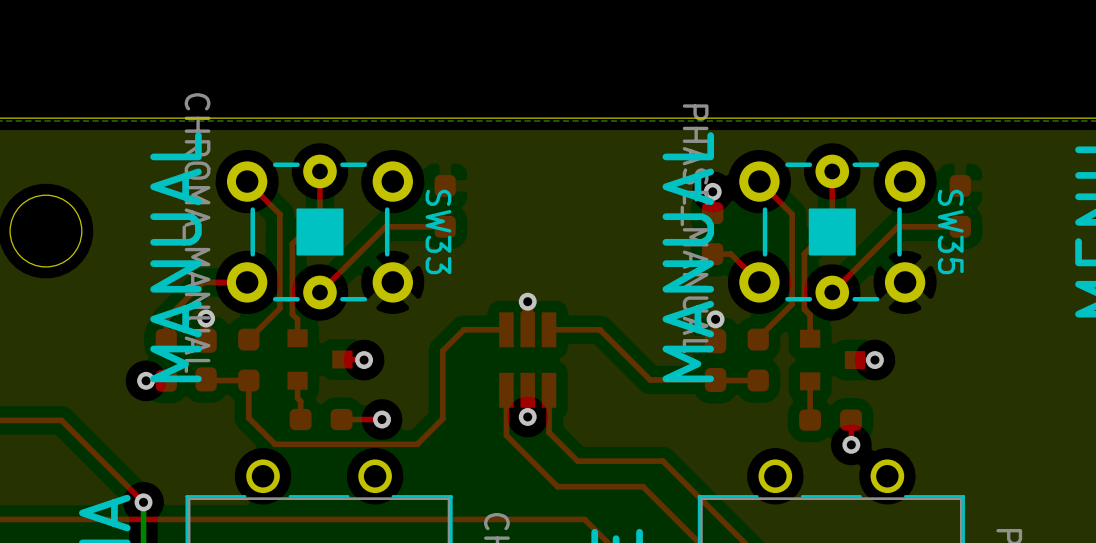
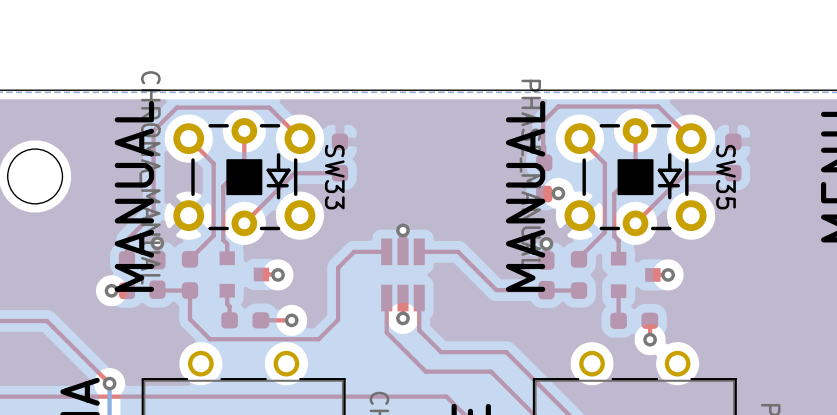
SW33 footprint: [226, 154, 413, 310] -> [173, 118, 316, 237]
SW35 footprint: [739, 154, 926, 310] -> [564, 118, 707, 237]
top track: none -> (691, 138) (658, 106) (558, 106) (543, 121) (543, 161)
via position: (712, 191) -> (558, 193)
top track: (712, 254) (730, 254) (759, 282) -> none
top track: (235, 282) (202, 282) (166, 319) -> (299, 138) (269, 107) (176, 107) (153, 130) (153, 213) (126, 240) (126, 243)

